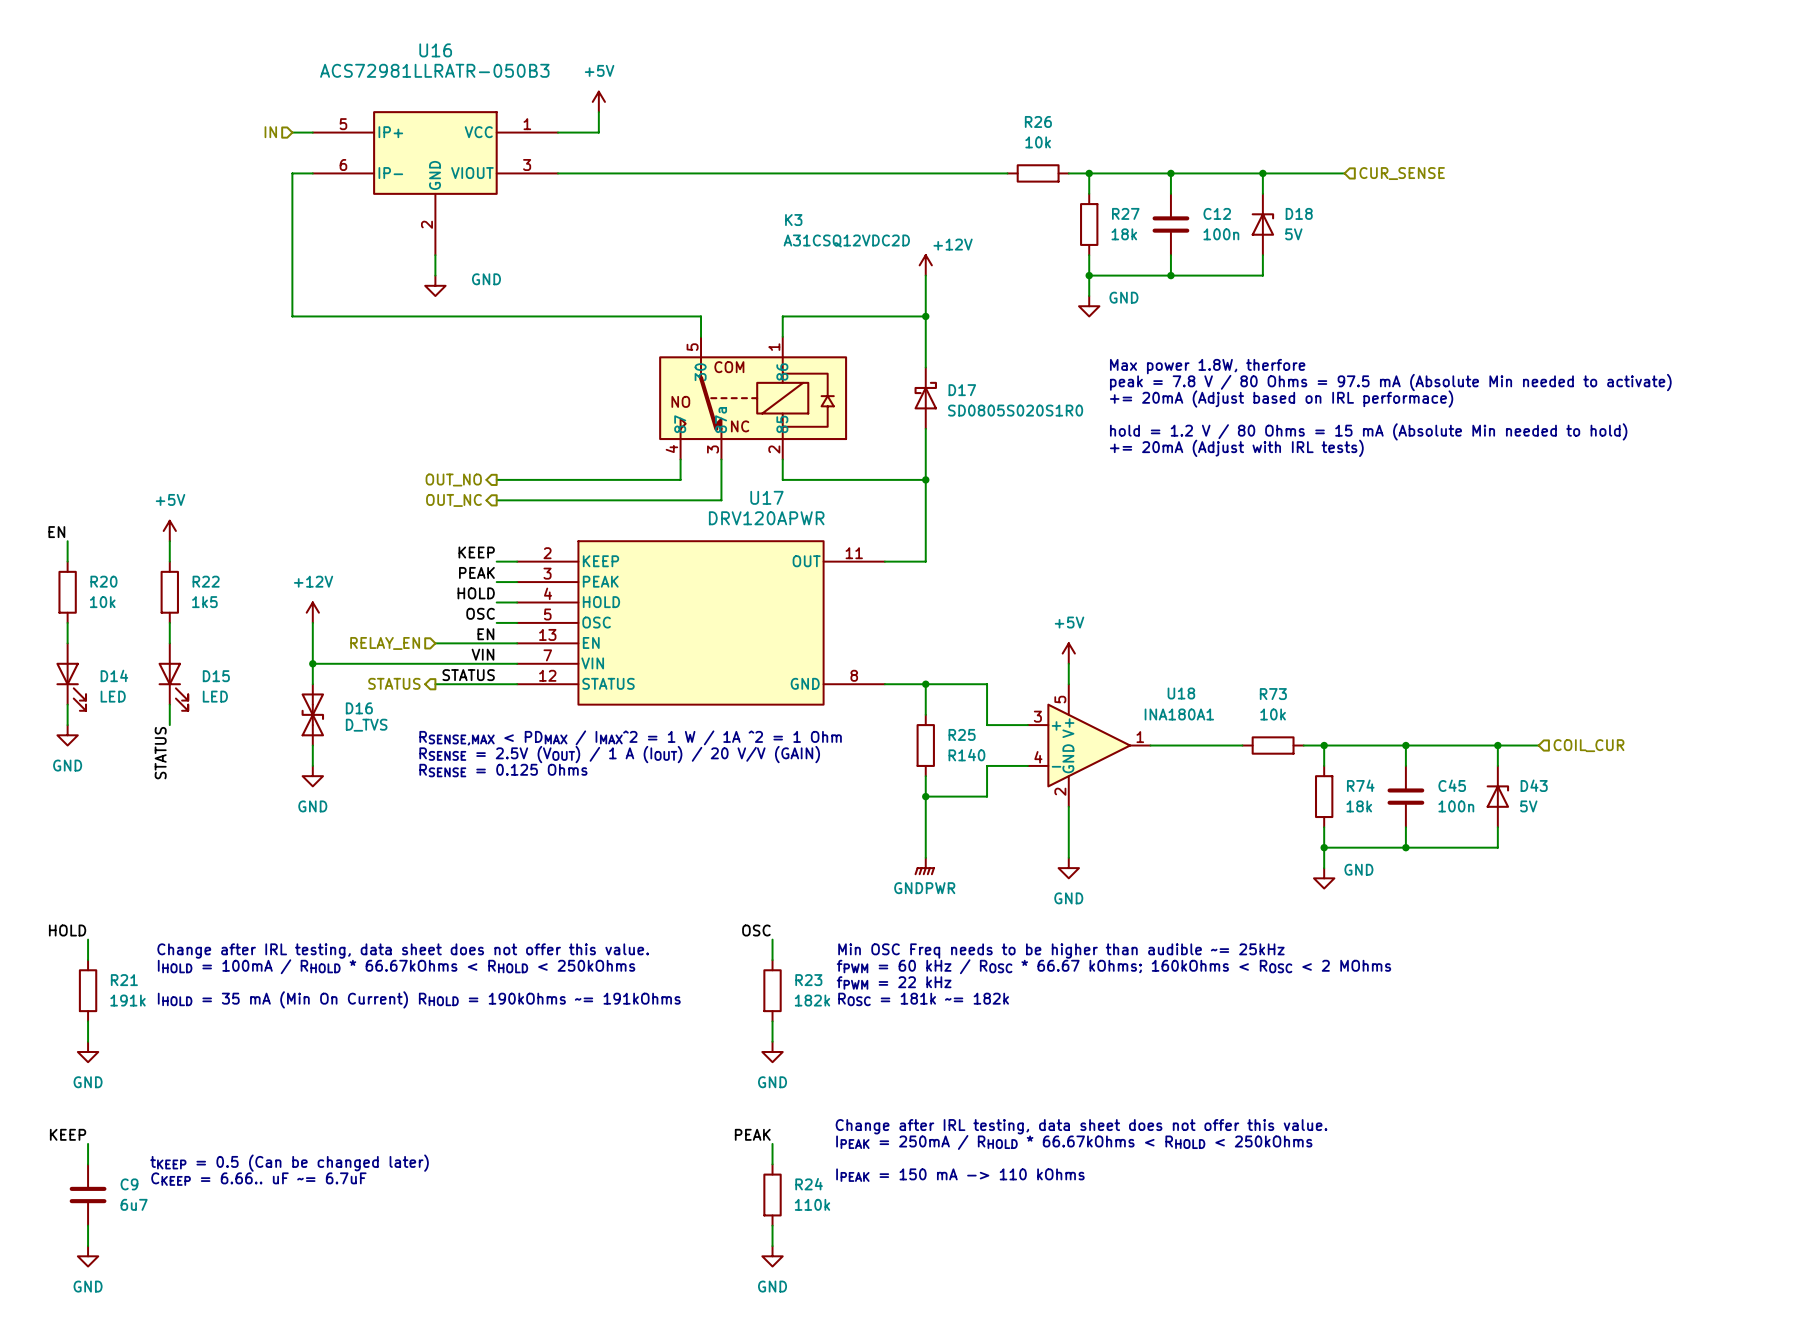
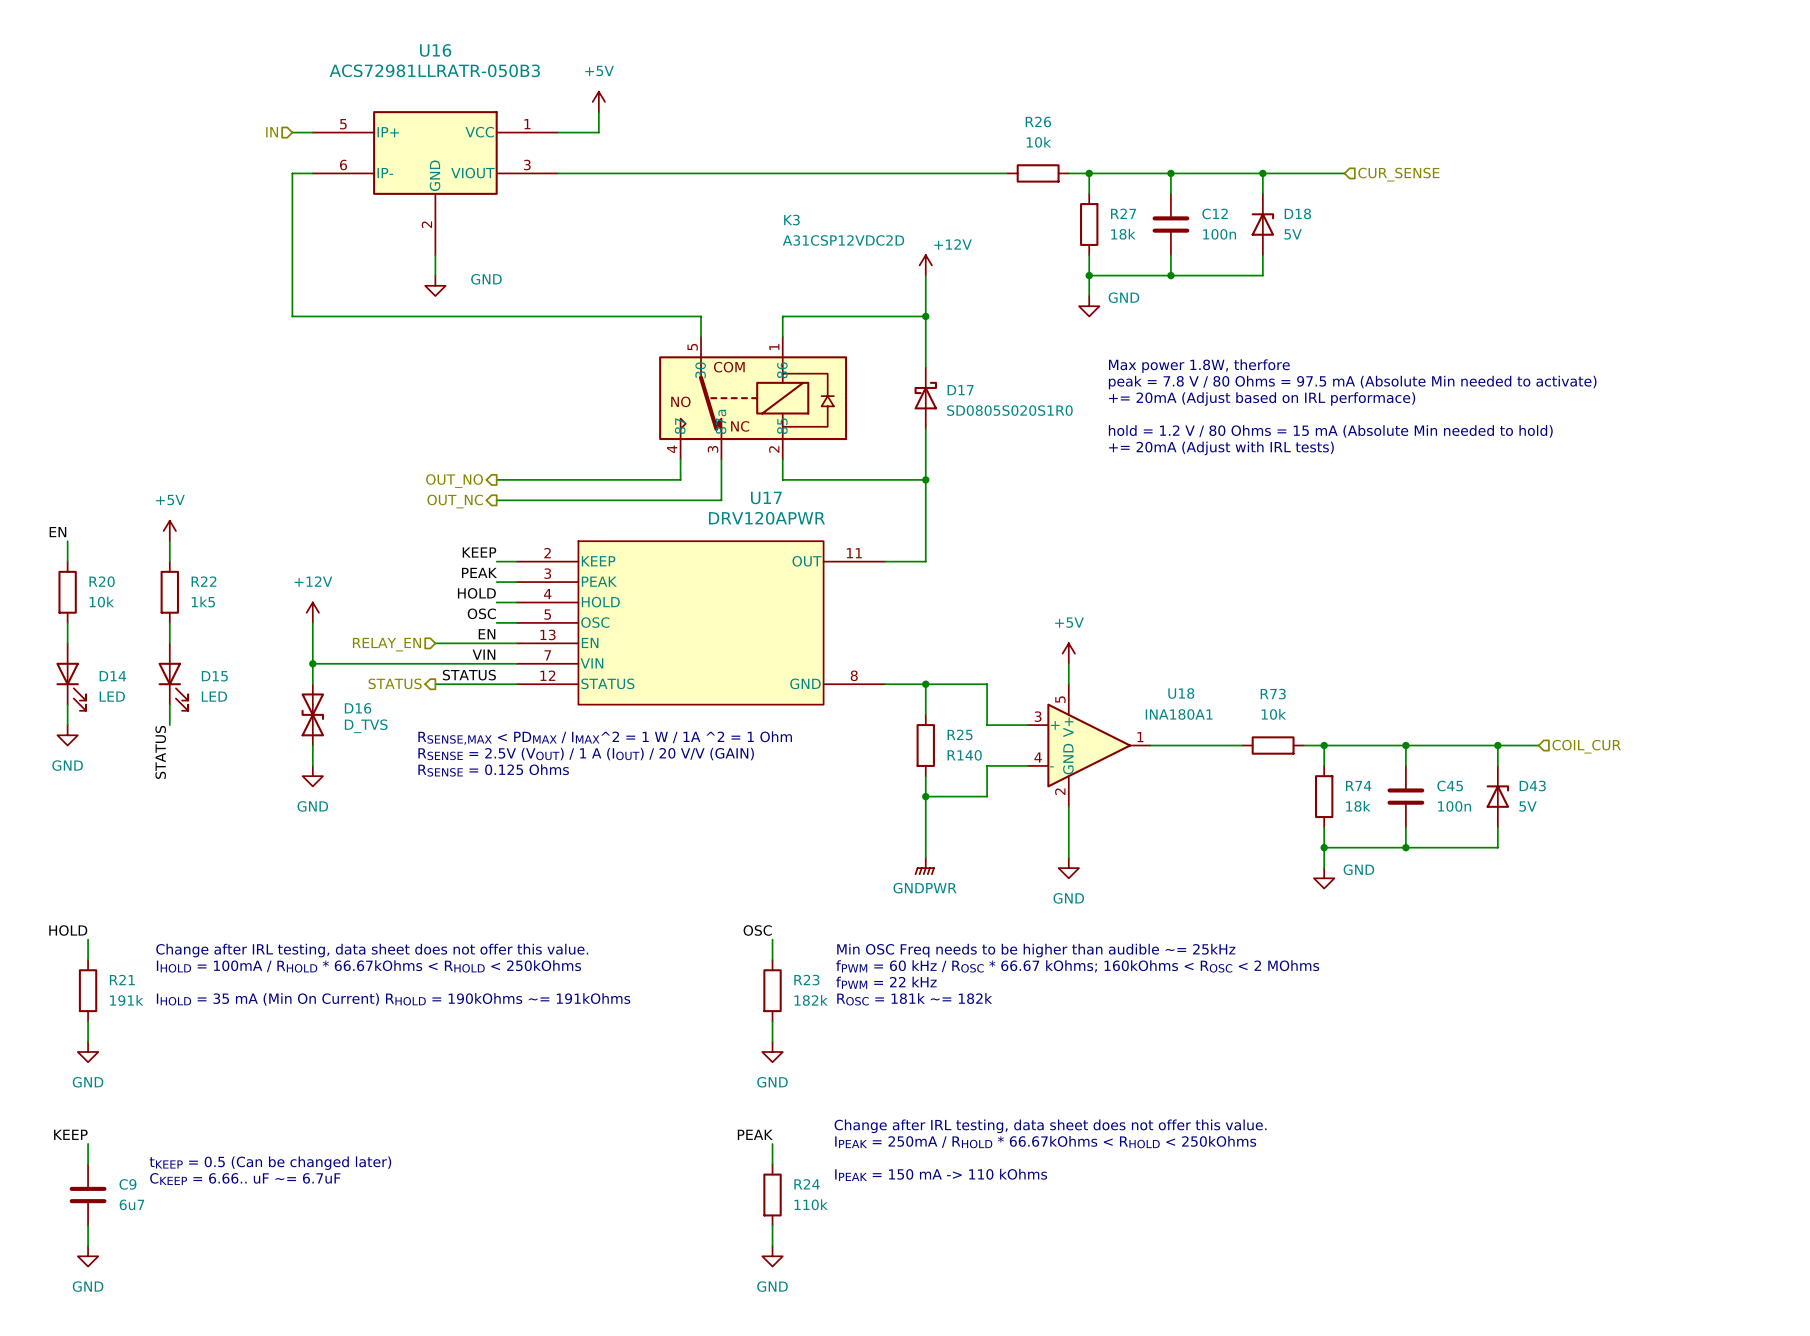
K3 value: A31CSQ12VDC2D (846, 240) -> A31CSP12VDC2D (843, 240)

